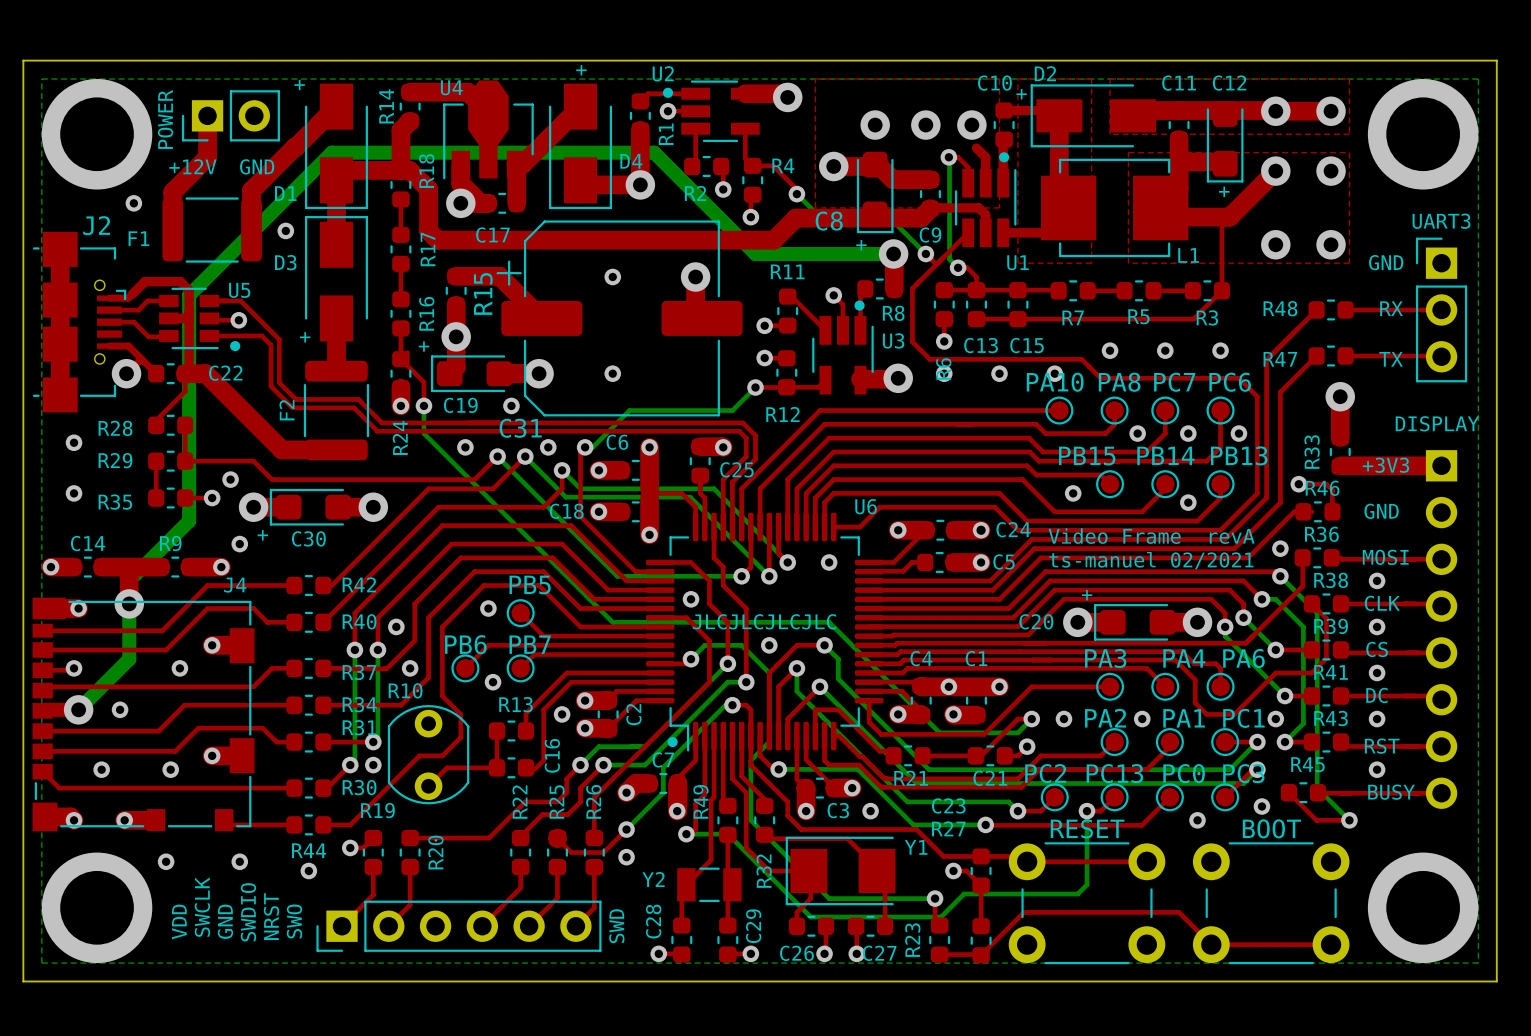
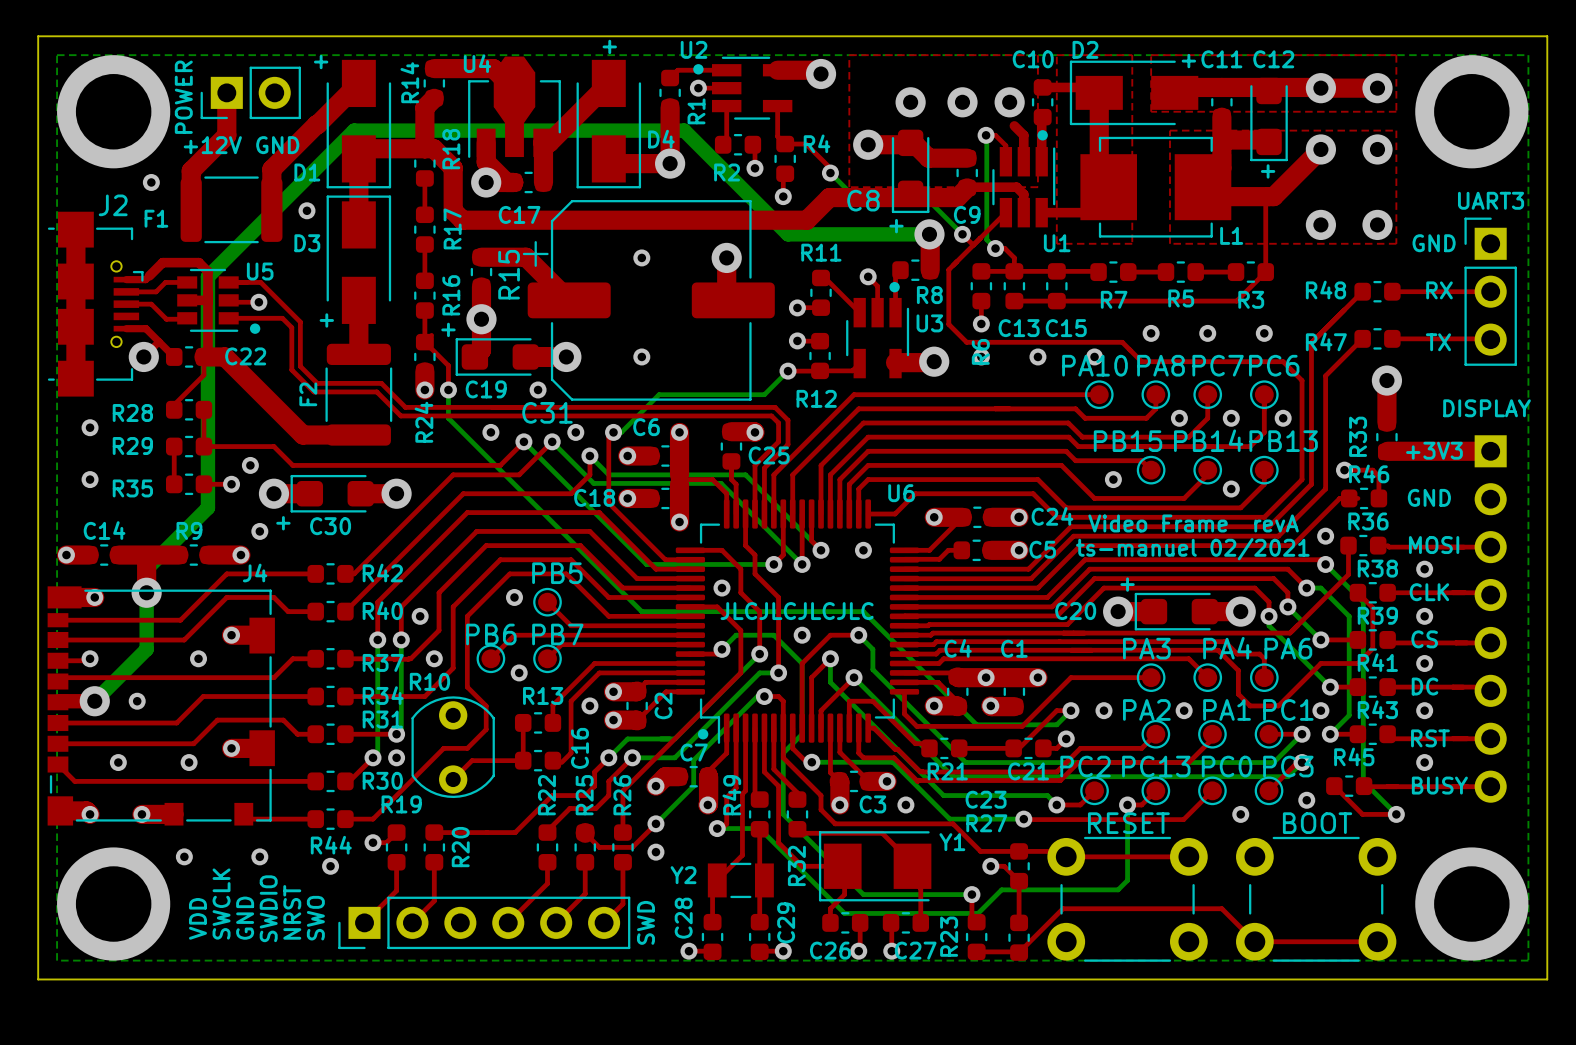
text position: + (1021, 94) -> + (1188, 61)

